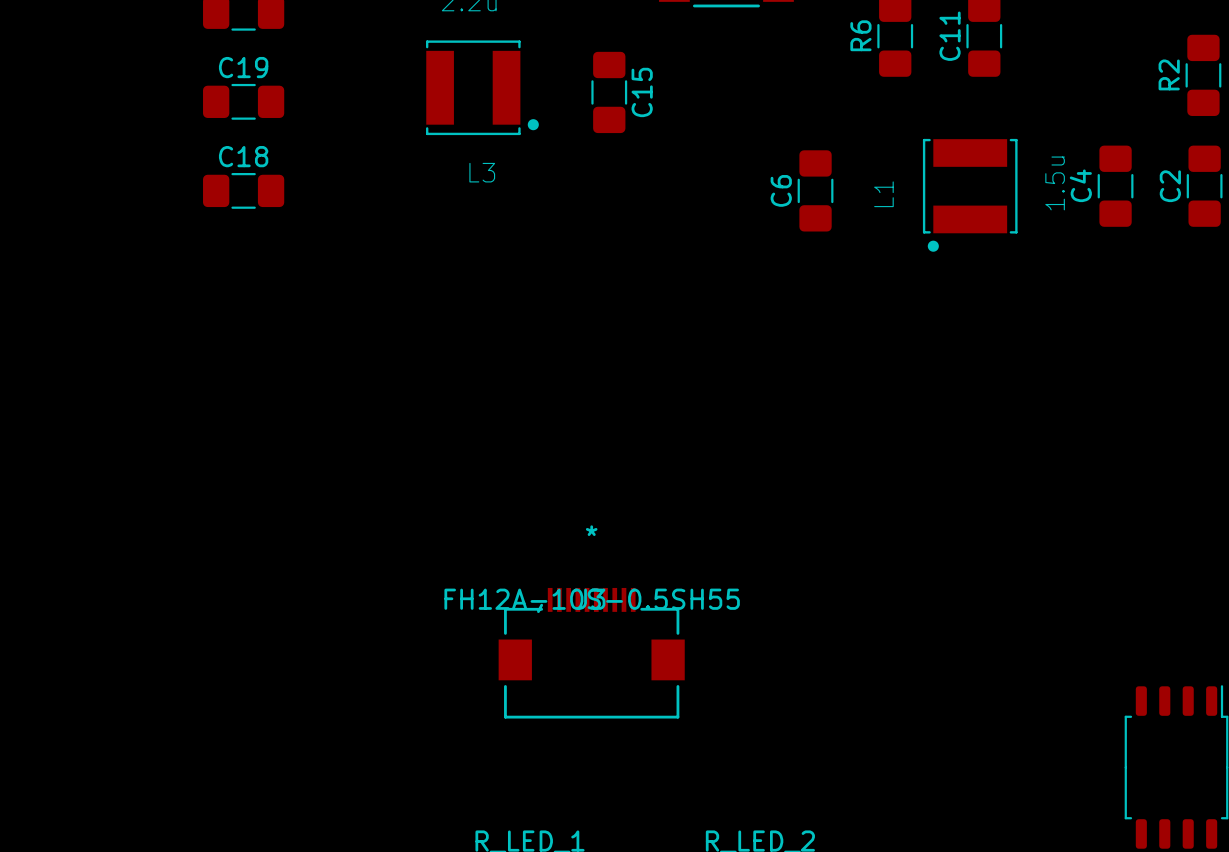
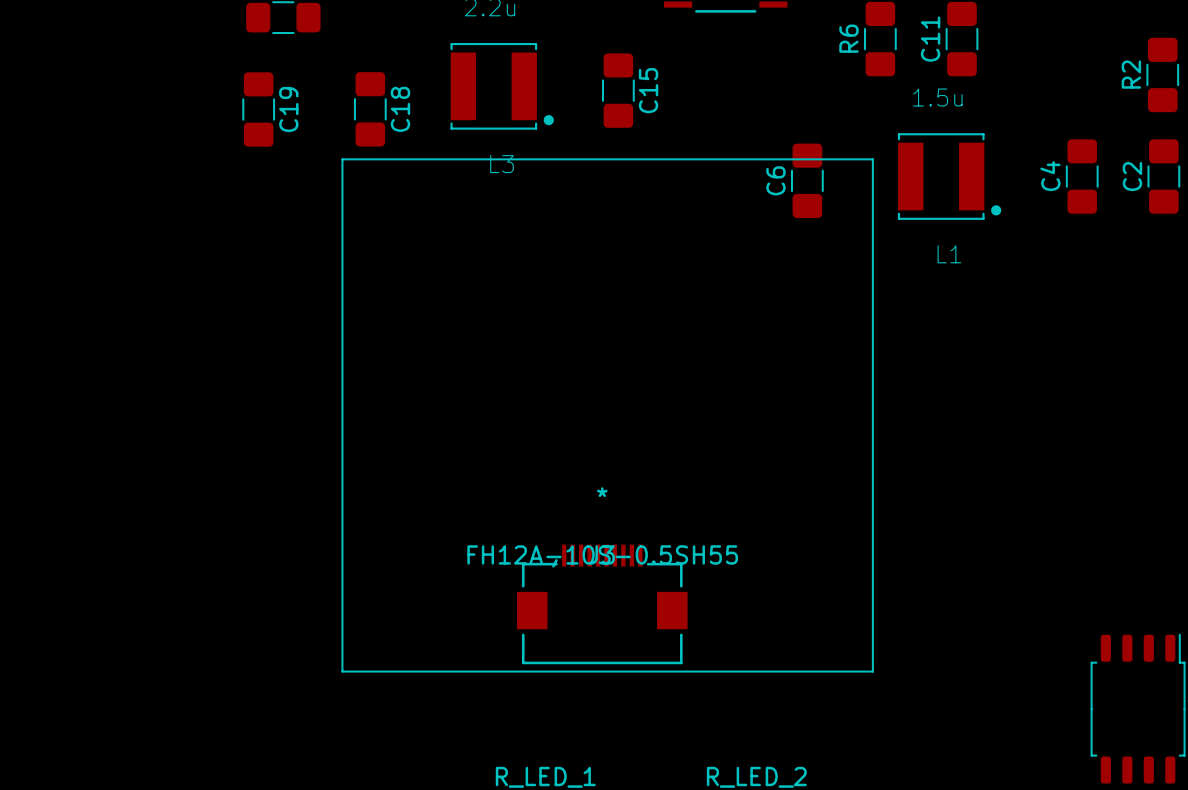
C19 rotation: 0° (243, 101) -> 90° clockwise (258, 109)
line: none -> (342, 159) (342, 671) (872, 671) (872, 159) (342, 159)
C18 rotation: 0° (243, 190) -> 90° clockwise (370, 109)
C18 position: (243, 190) -> (370, 109)
L1 rotation: 0° (970, 195) -> 90° counterclockwise (949, 176)

